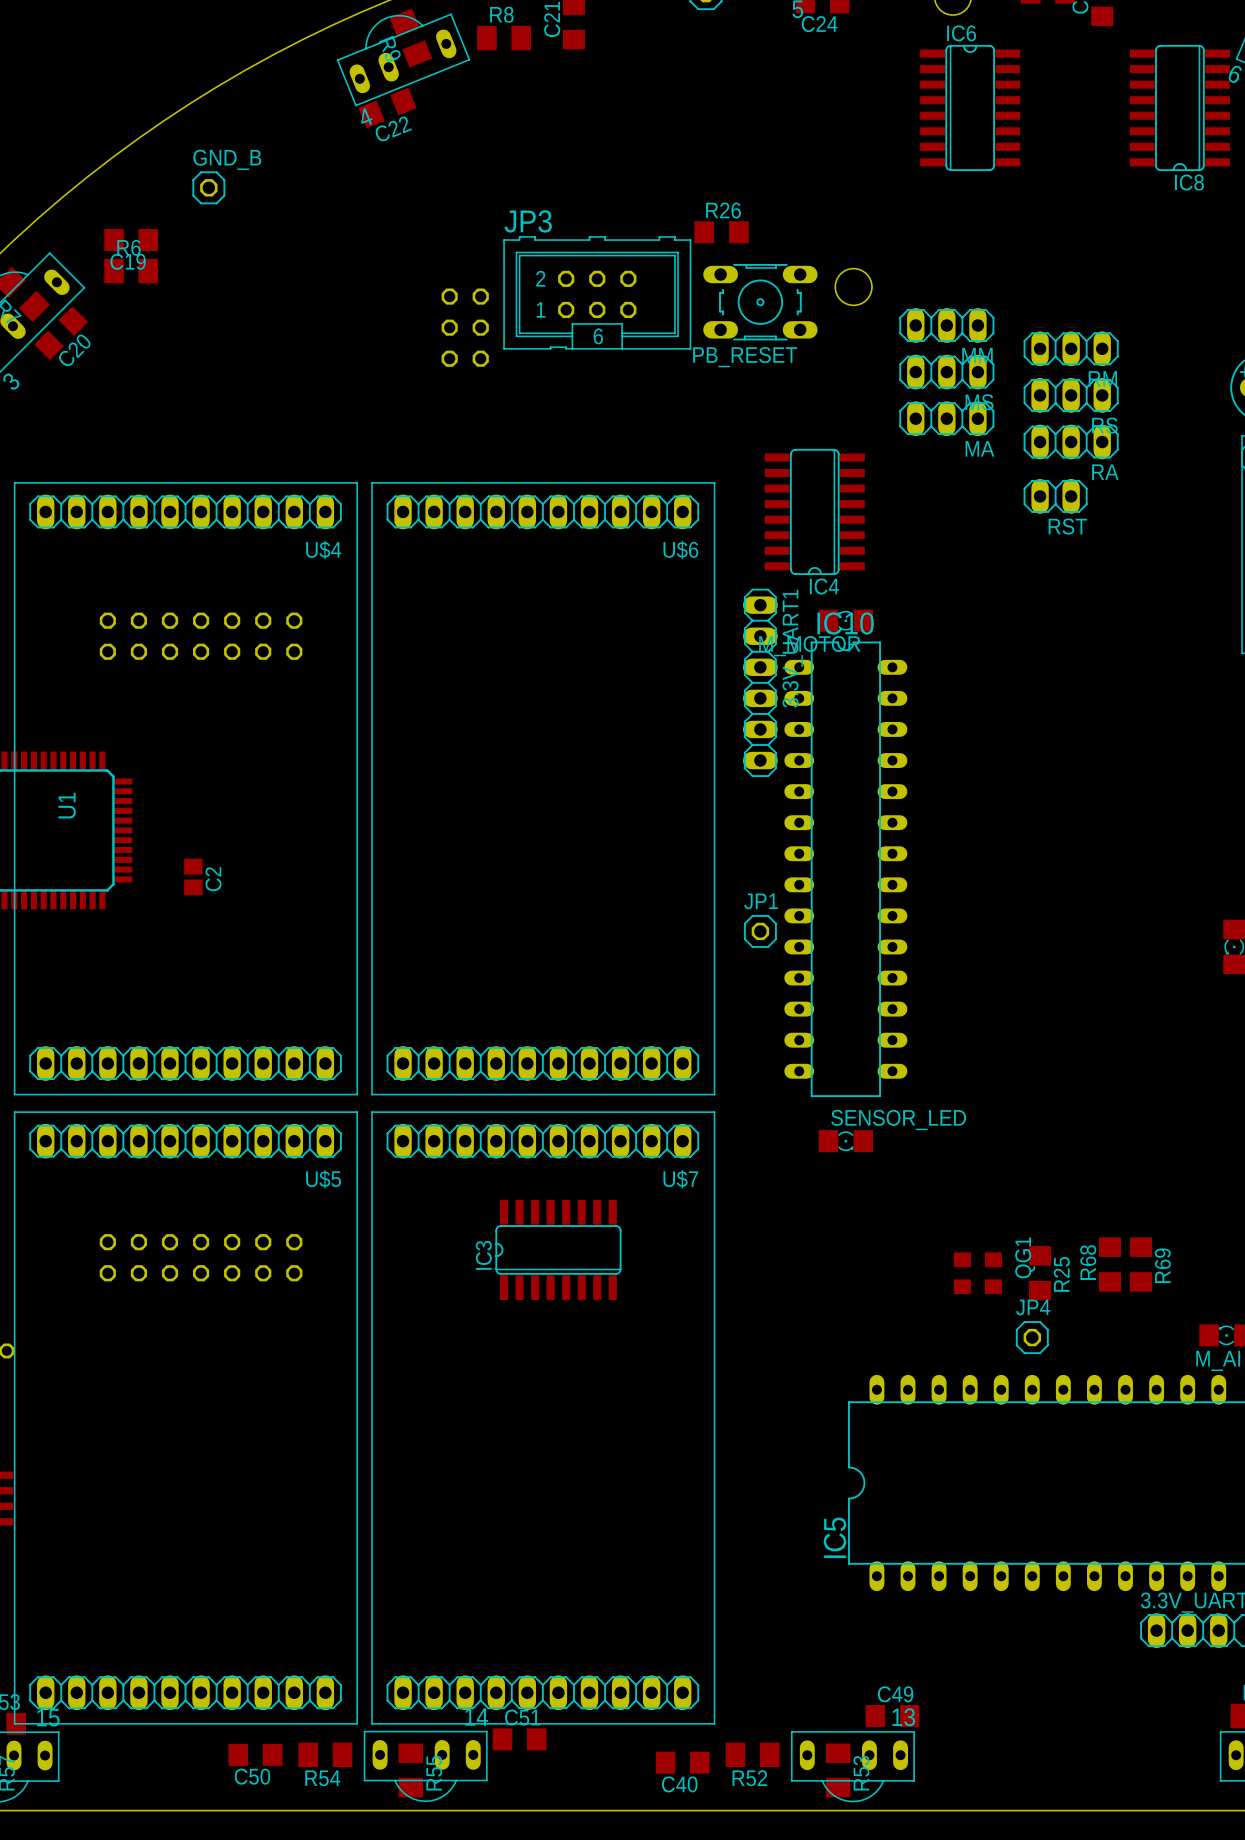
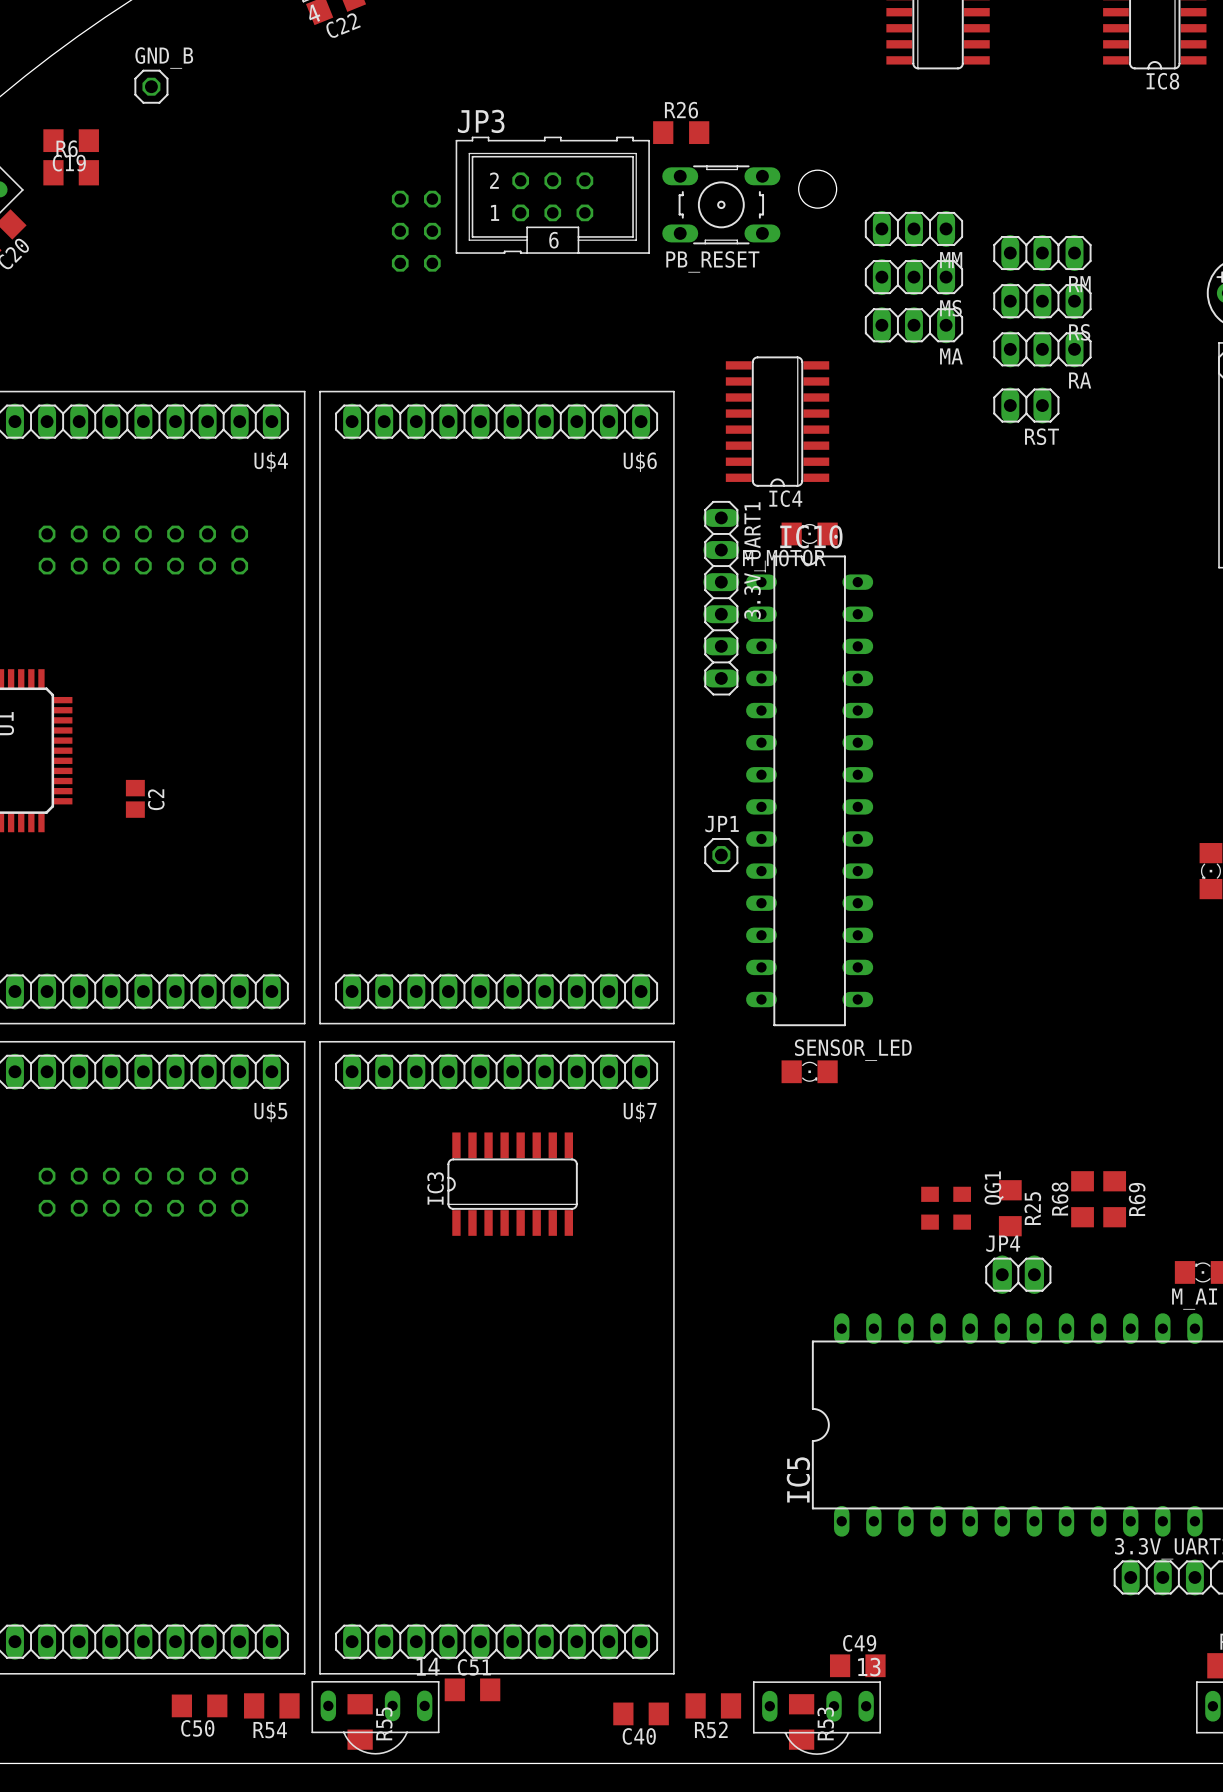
JP4 footprint: [1015, 1321, 1049, 1355] -> [985, 1255, 1052, 1294]

